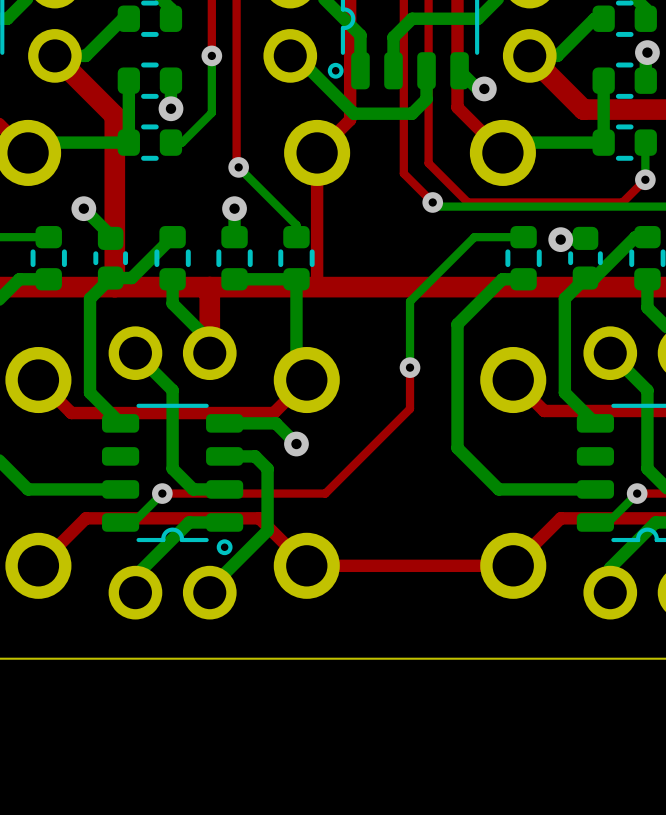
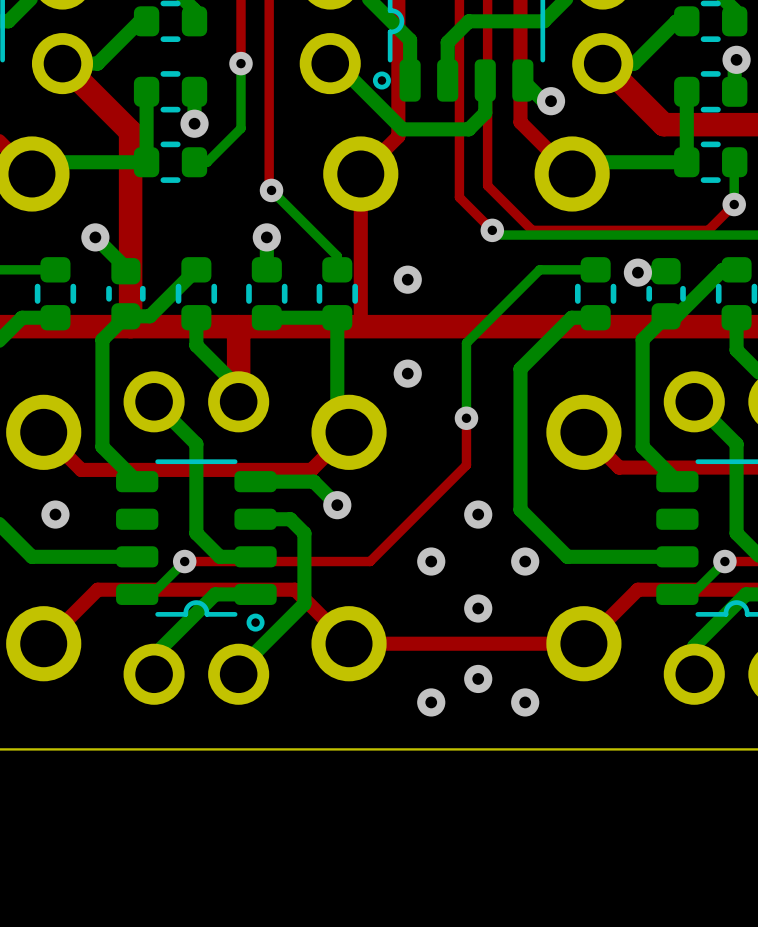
via: none -> (407, 279)
via: none -> (407, 373)
via: none -> (55, 514)
via: none -> (478, 514)
via: none -> (431, 561)
via: none -> (525, 561)
via: none -> (478, 608)
via: none -> (478, 678)
via: none -> (431, 702)
via: none -> (525, 702)

